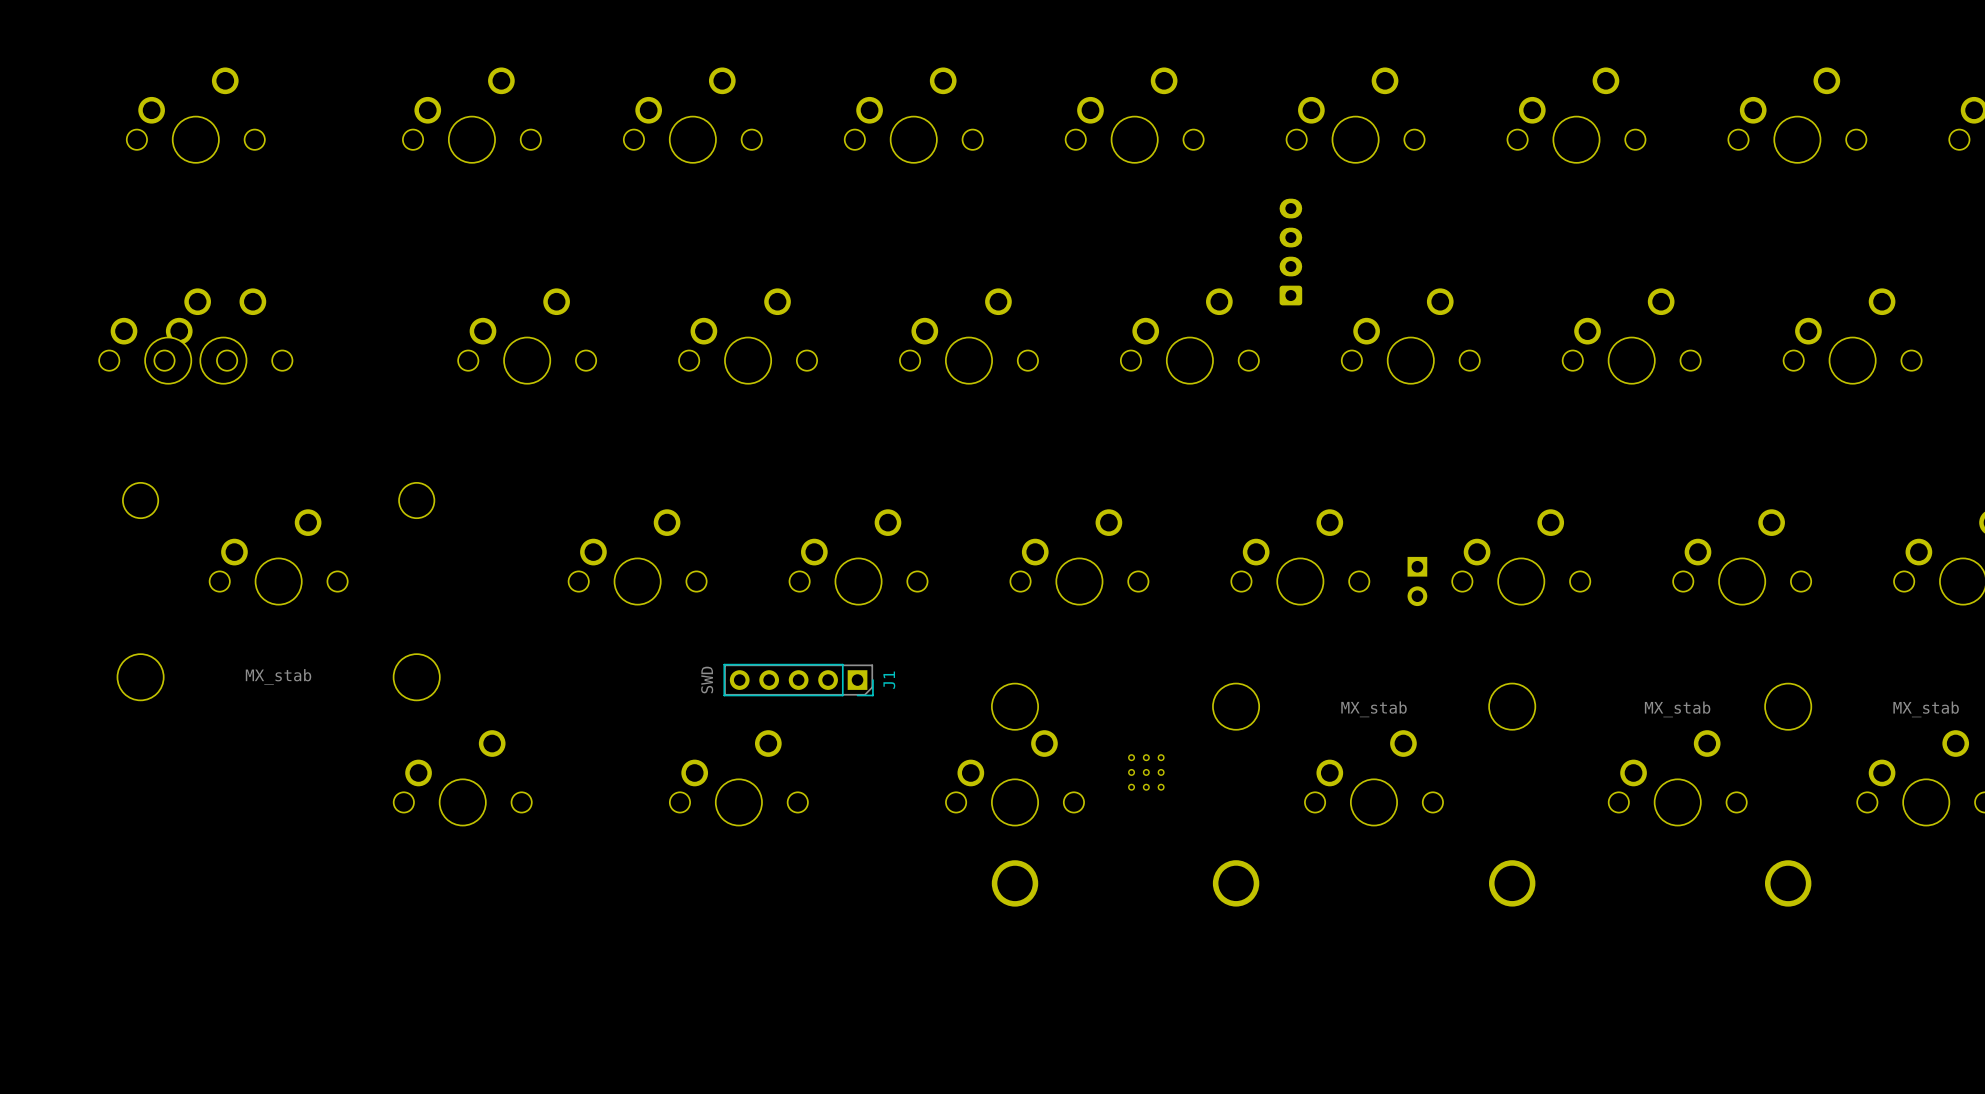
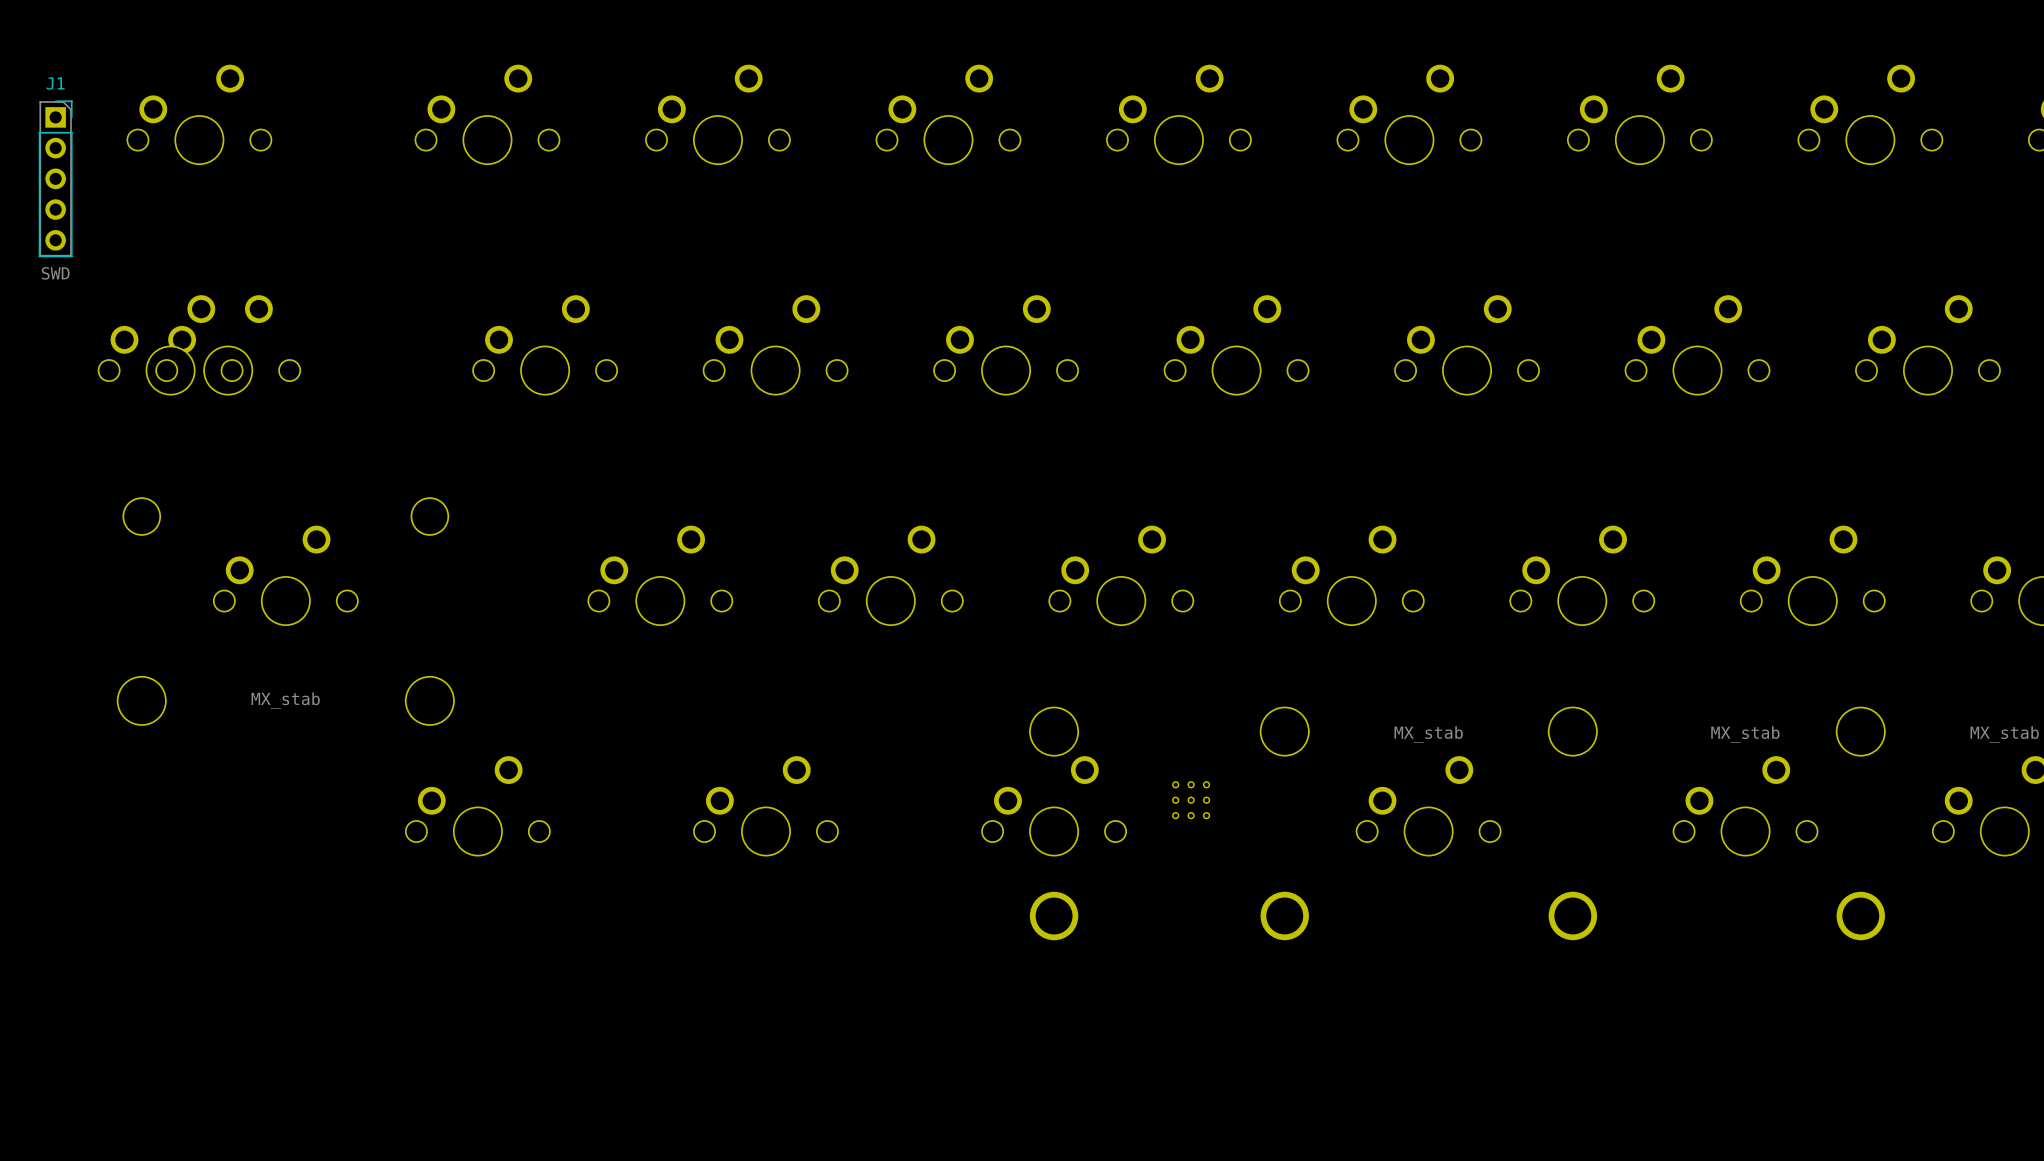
part: (1290, 252) -> none
part: (1417, 581) -> none
J1 rotation: 0° (798, 680) -> 90° counterclockwise (55, 178)
J1 position: (798, 680) -> (55, 178)

